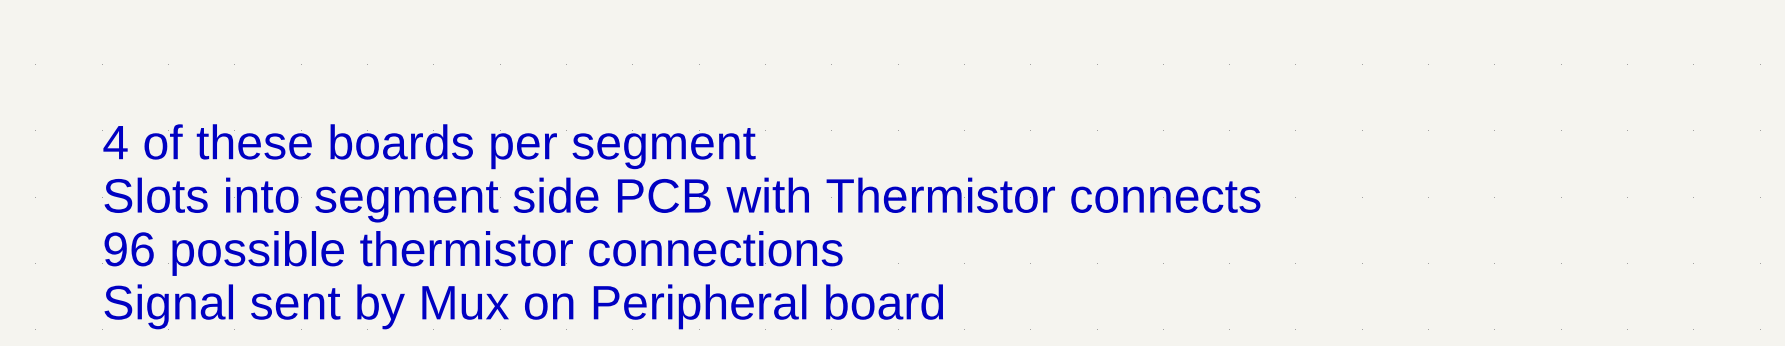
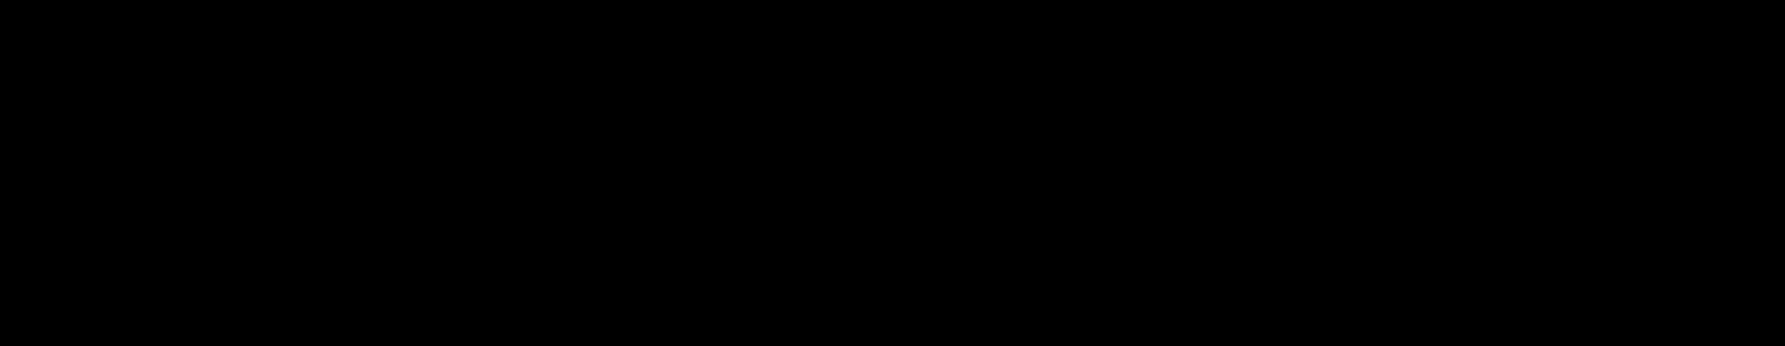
text: 4 of these boards per segment (429, 146) -> none
text: Slots into segment side PCB with Thermistor connects (682, 200) -> none
text: 96 possible thermistor connections (473, 253) -> none
text: Signal sent by Mux on Peripheral board (523, 306) -> none

